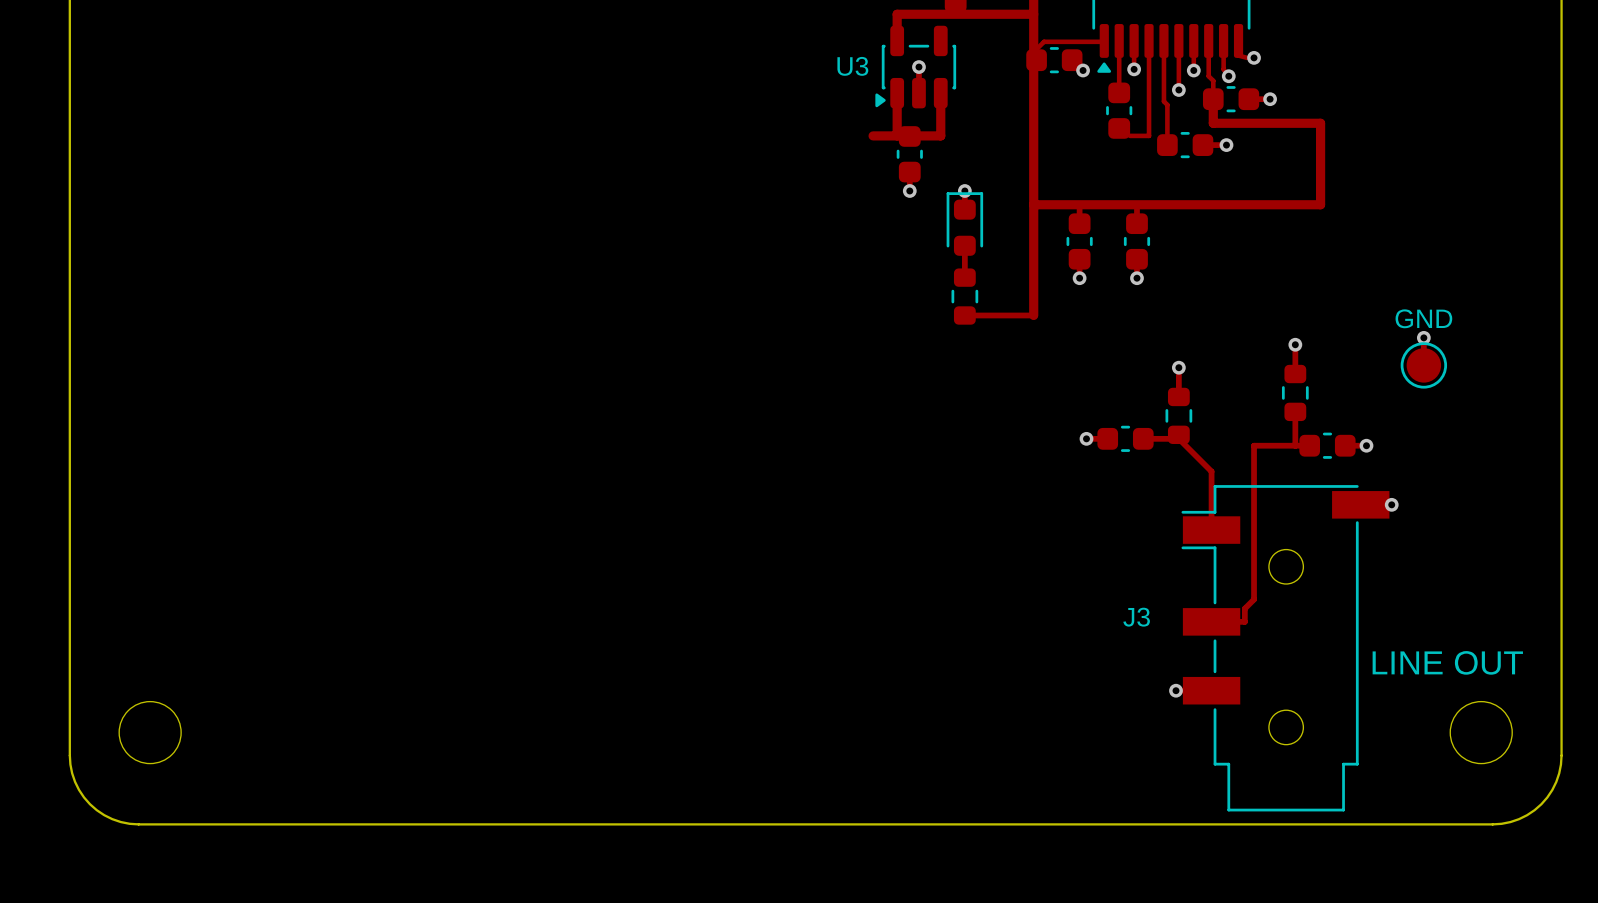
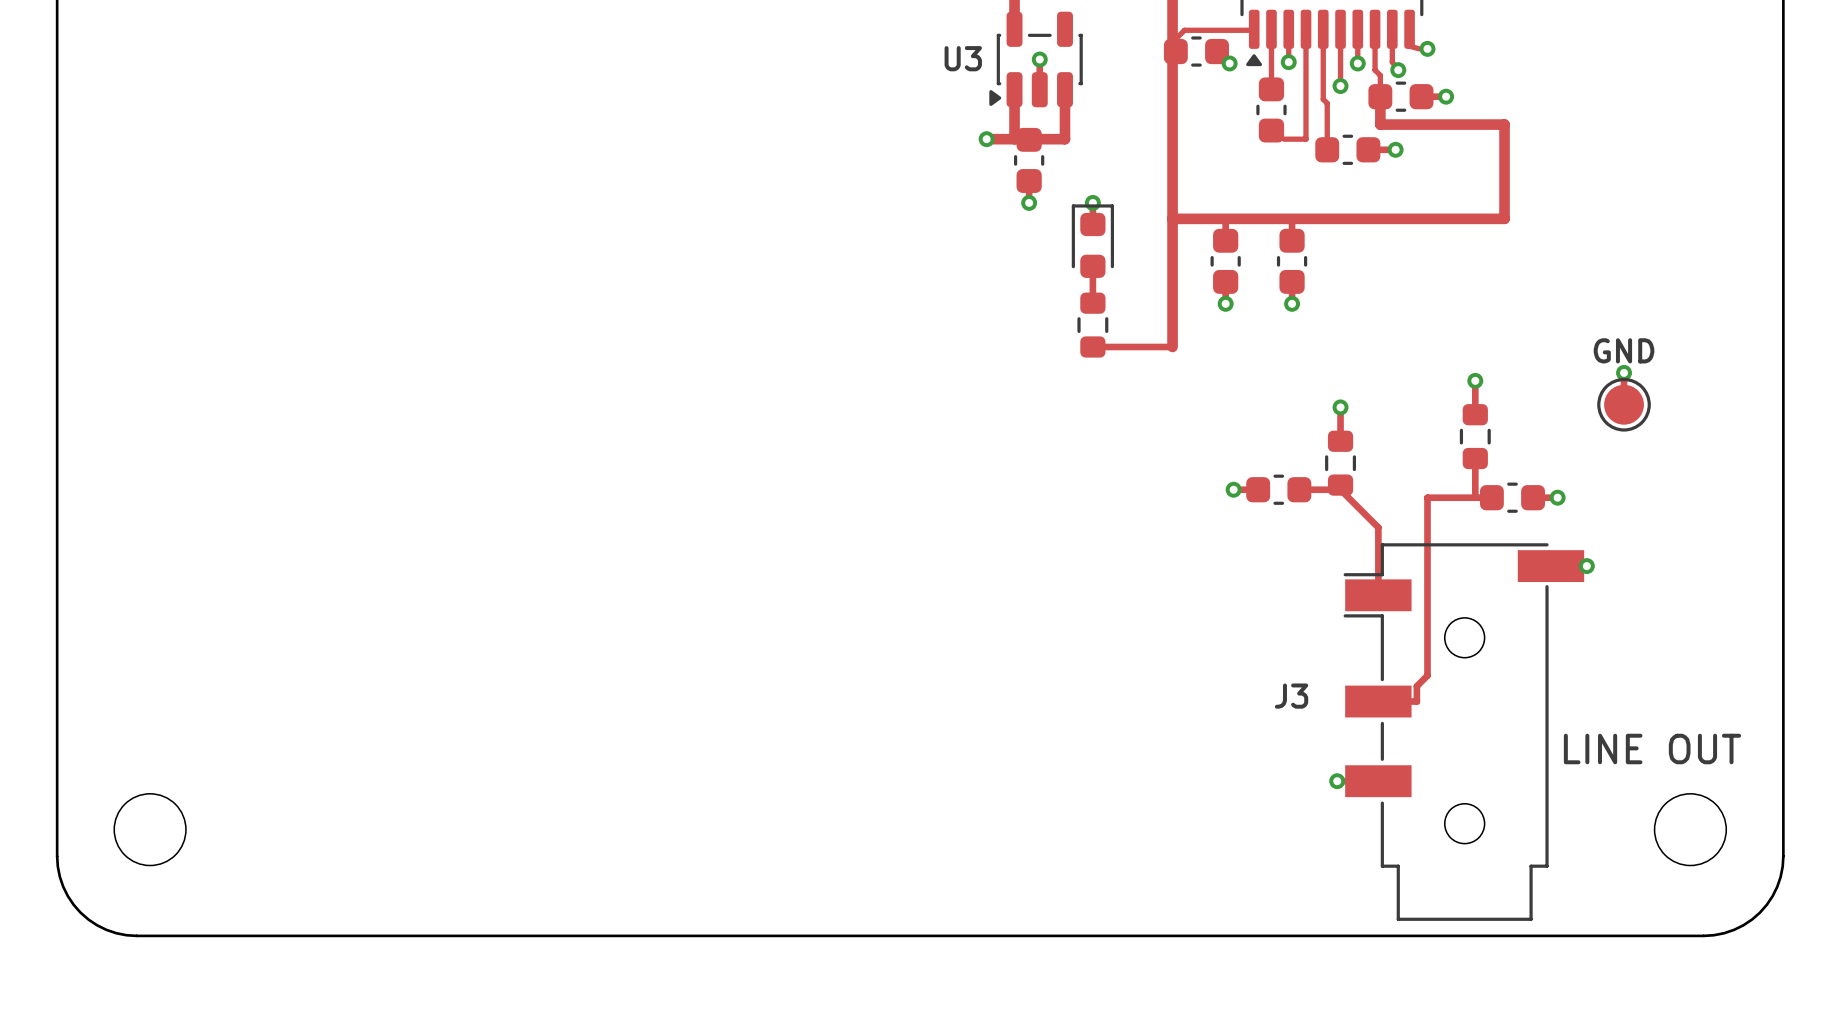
via: none -> (986, 139)

